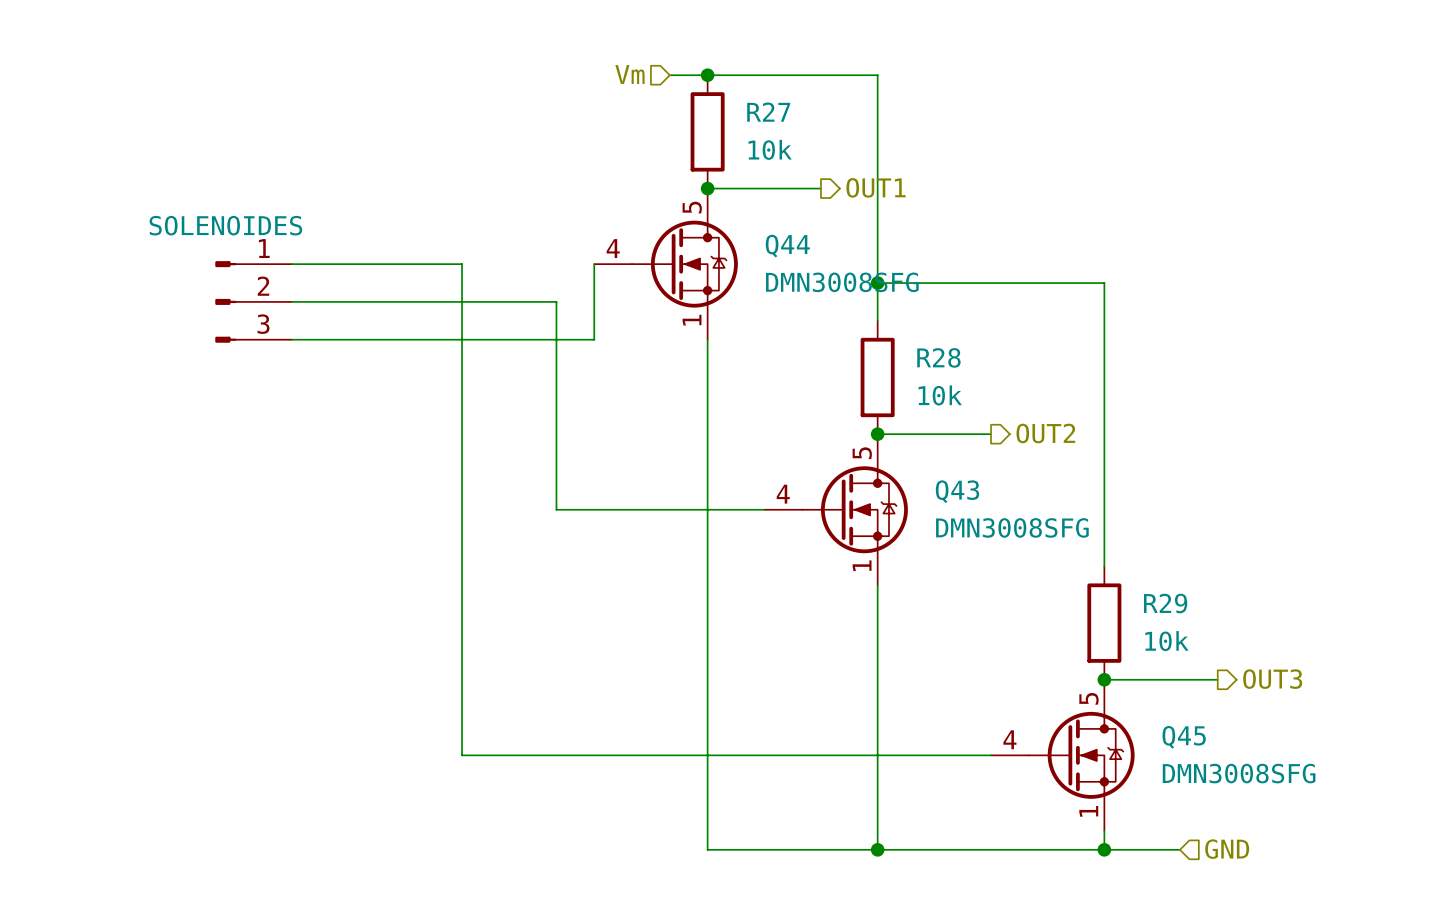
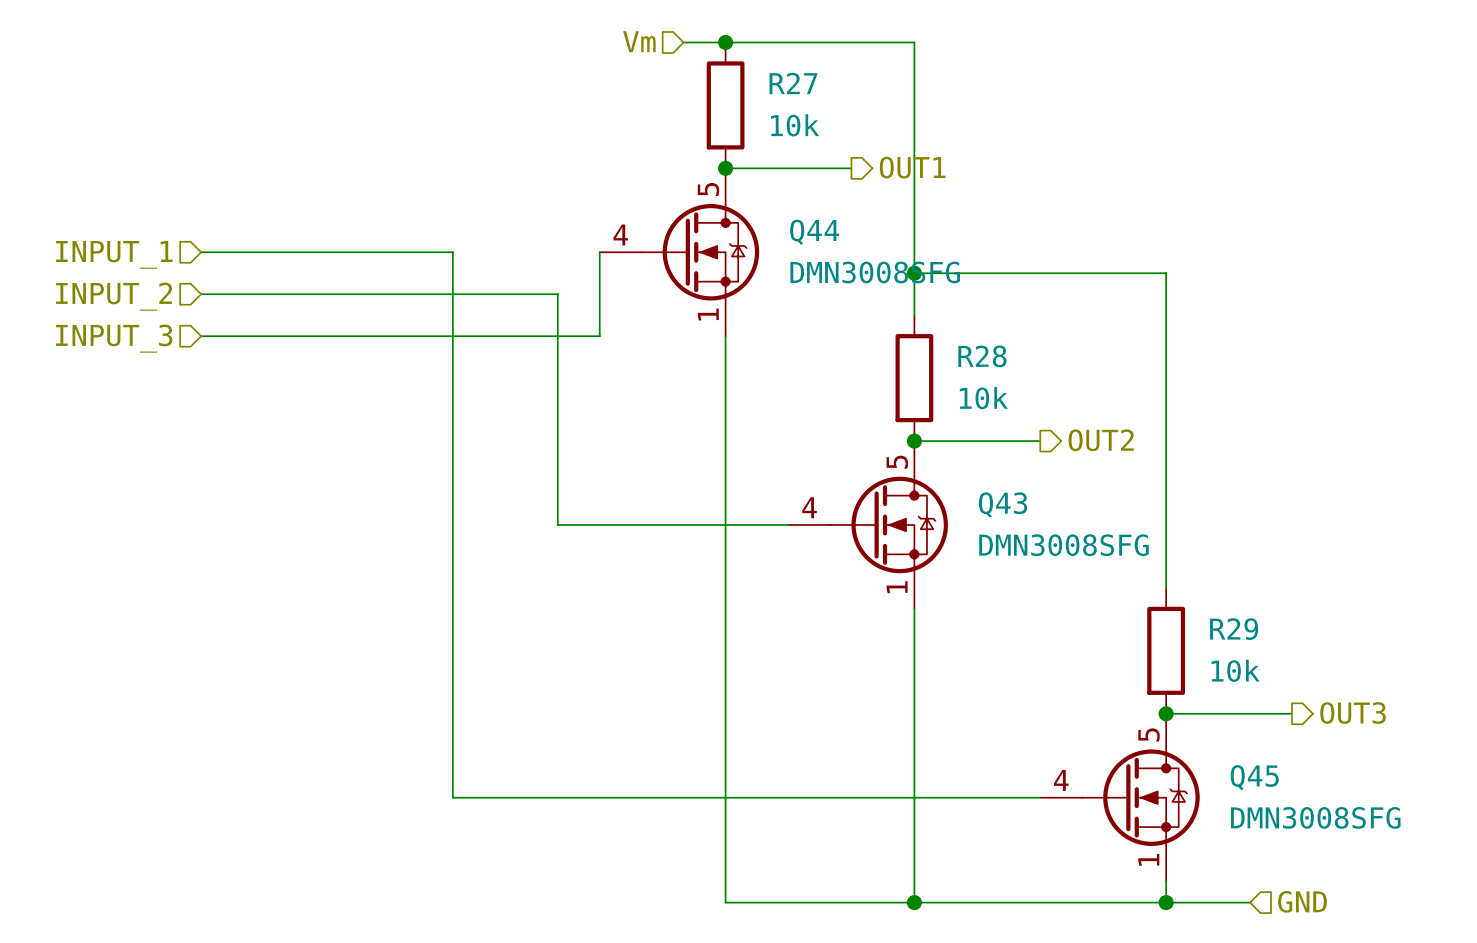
hierarchical label: none -> INPUT_1 (114, 254)
part: SOLENOIDES (253, 301) -> none
hierarchical label: none -> INPUT_2 (114, 296)
hierarchical label: none -> INPUT_3 (114, 338)

